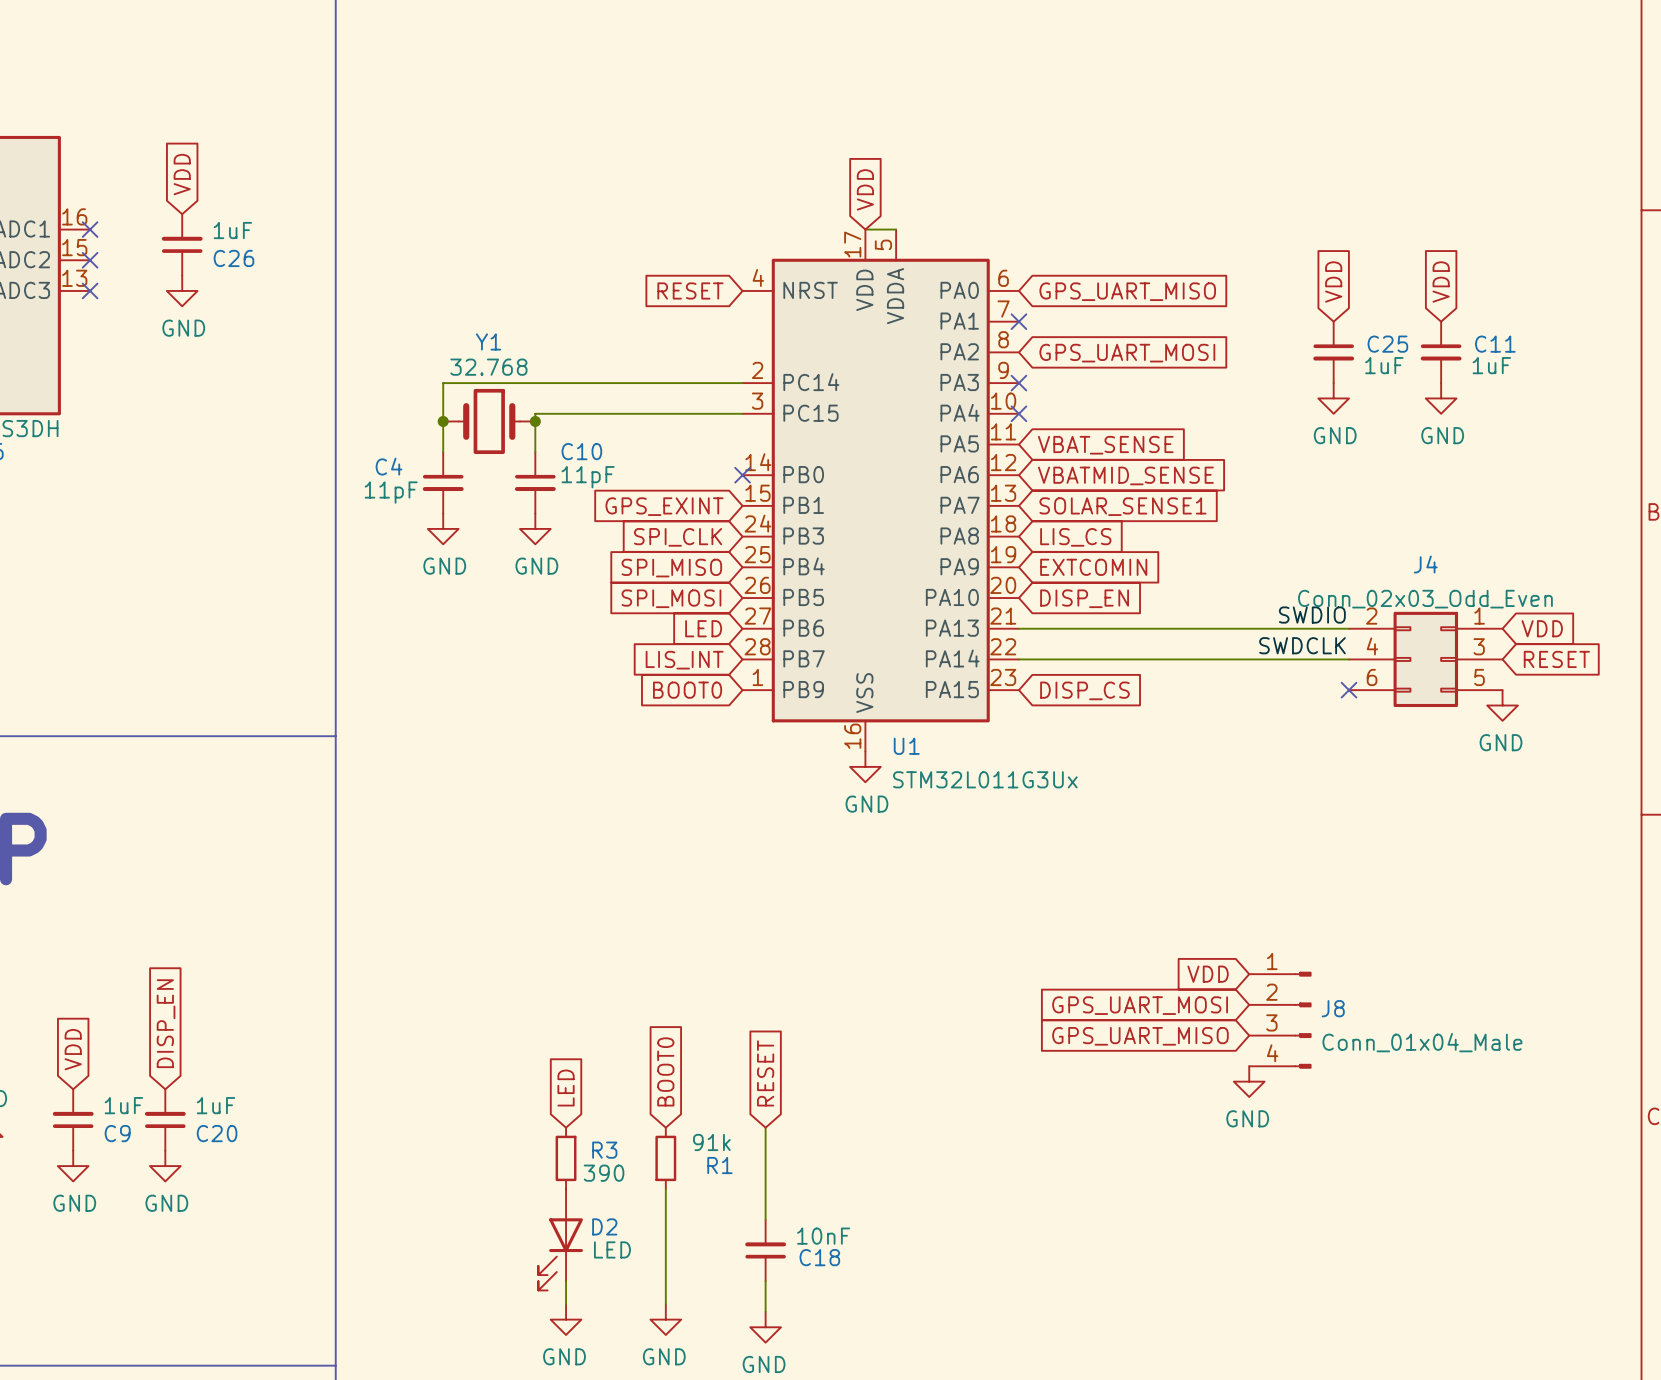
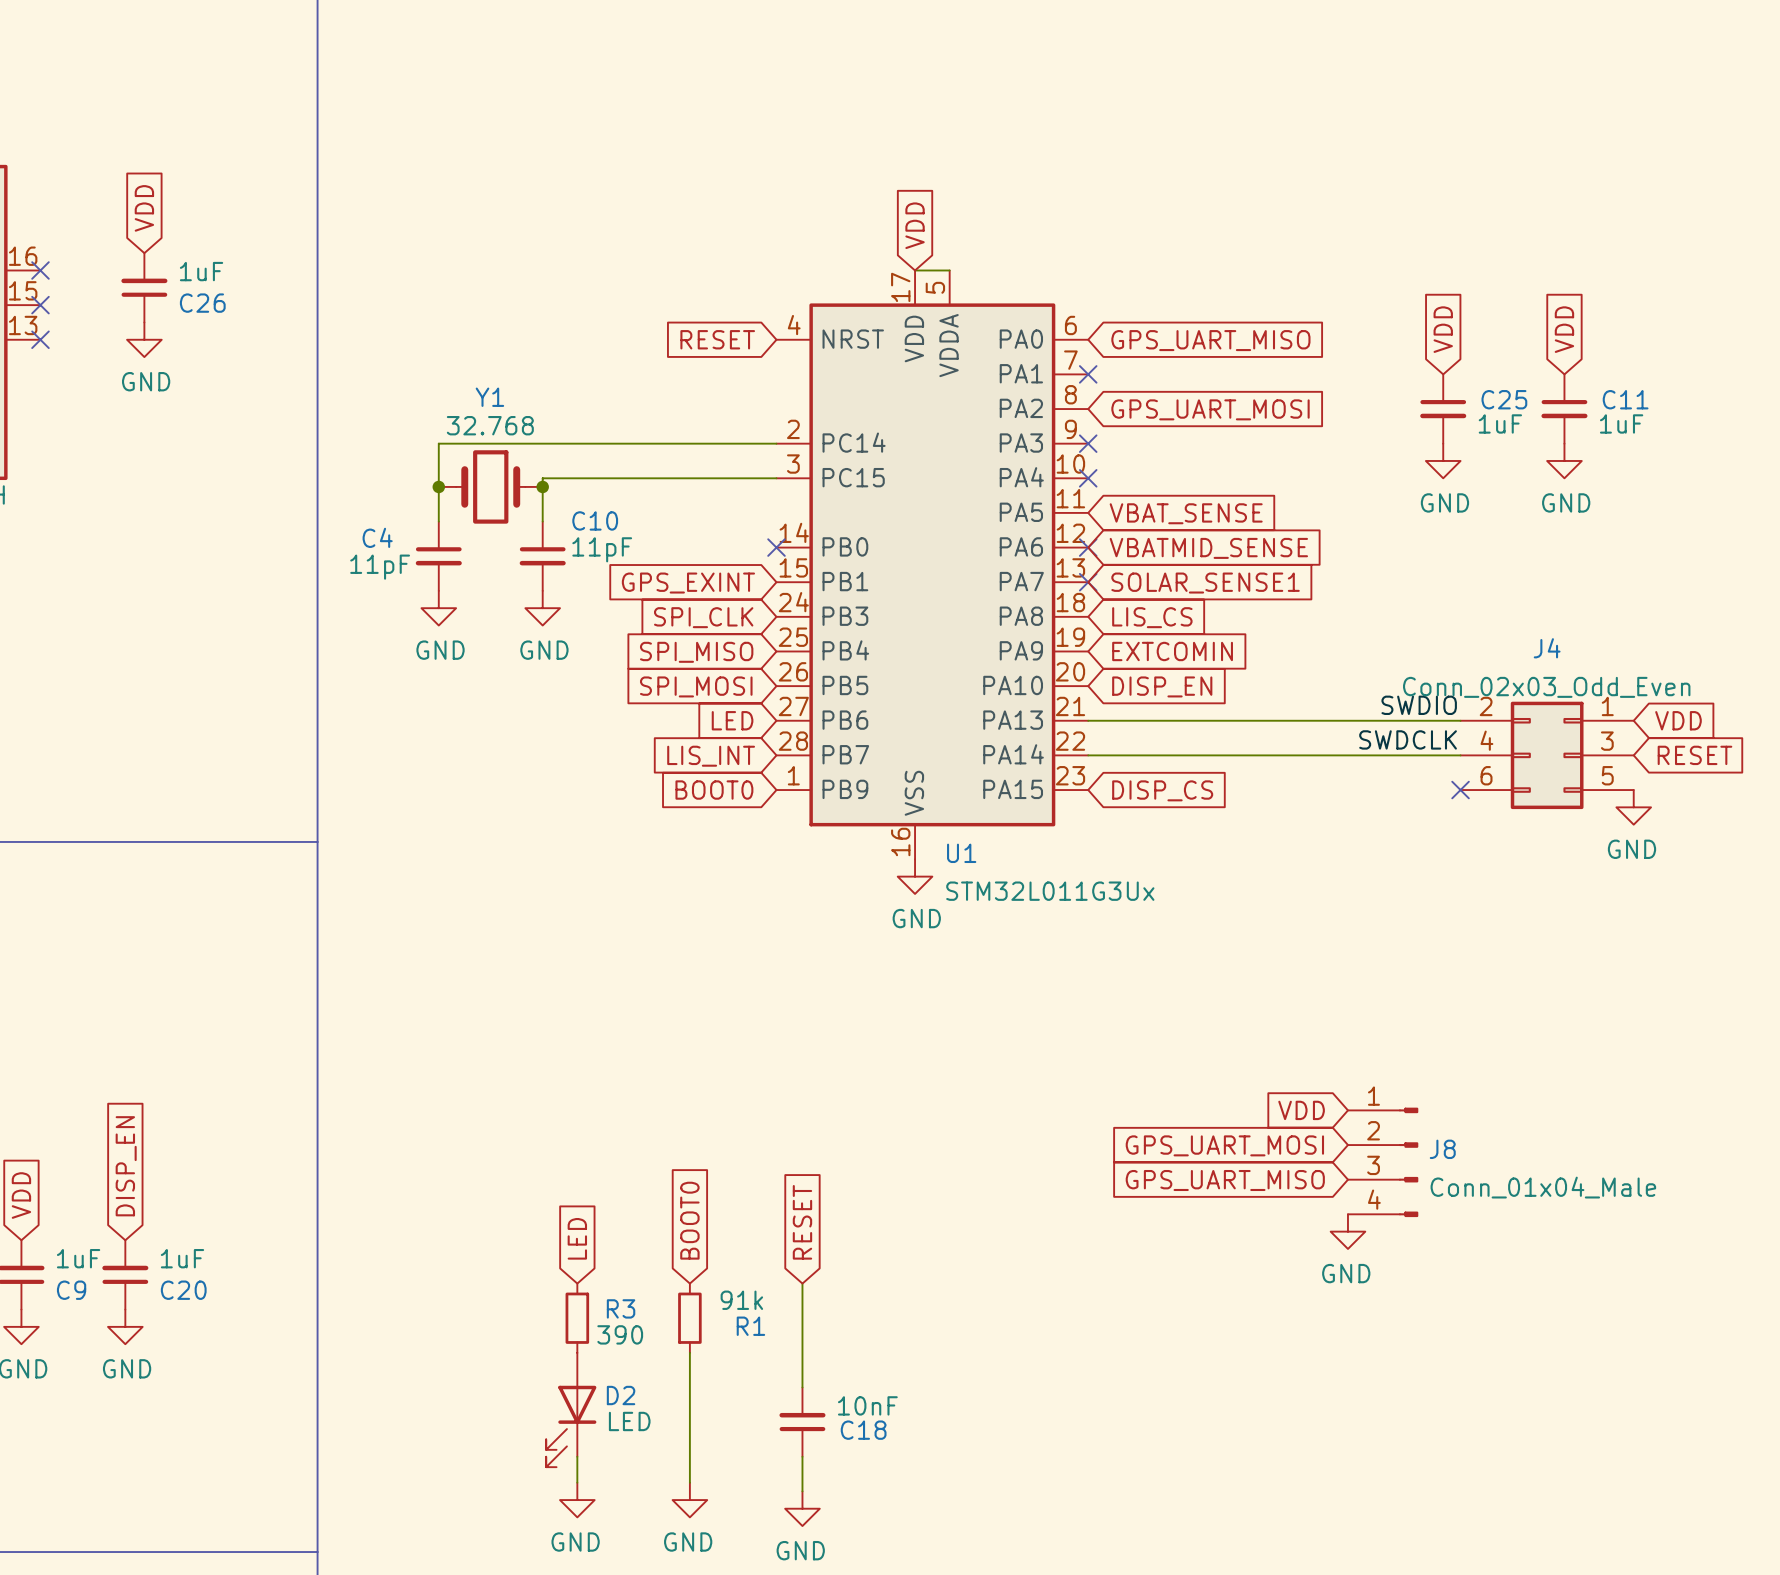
no-connect mark: none -> (1088, 547)
no-connect mark: none -> (1088, 582)

